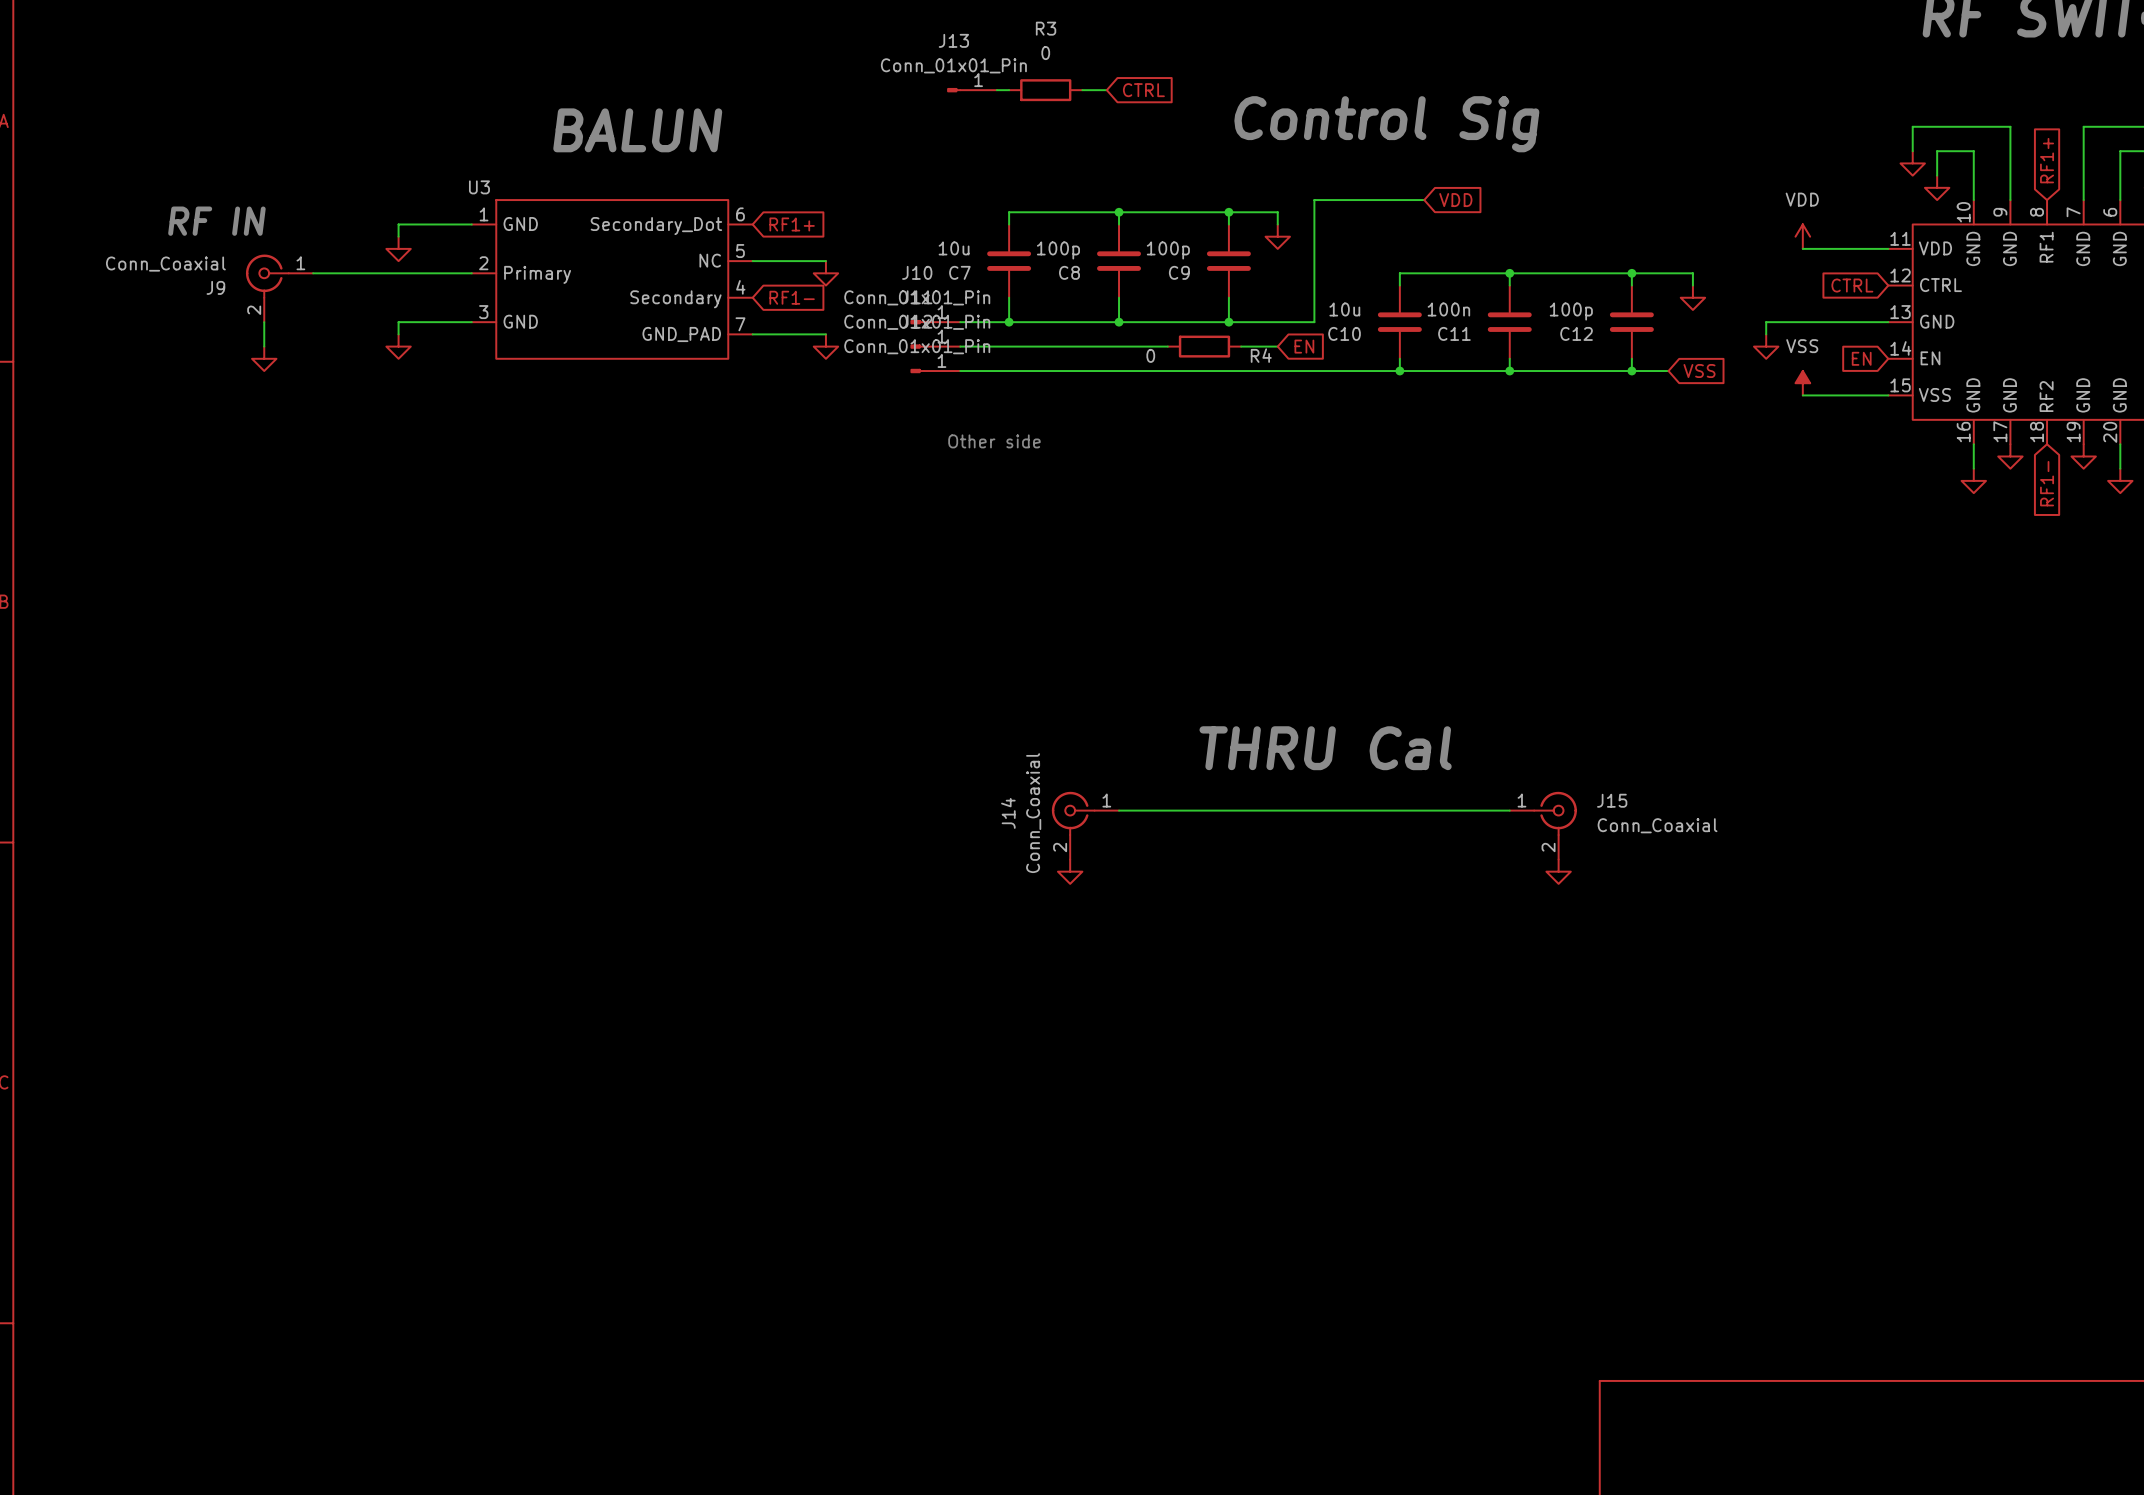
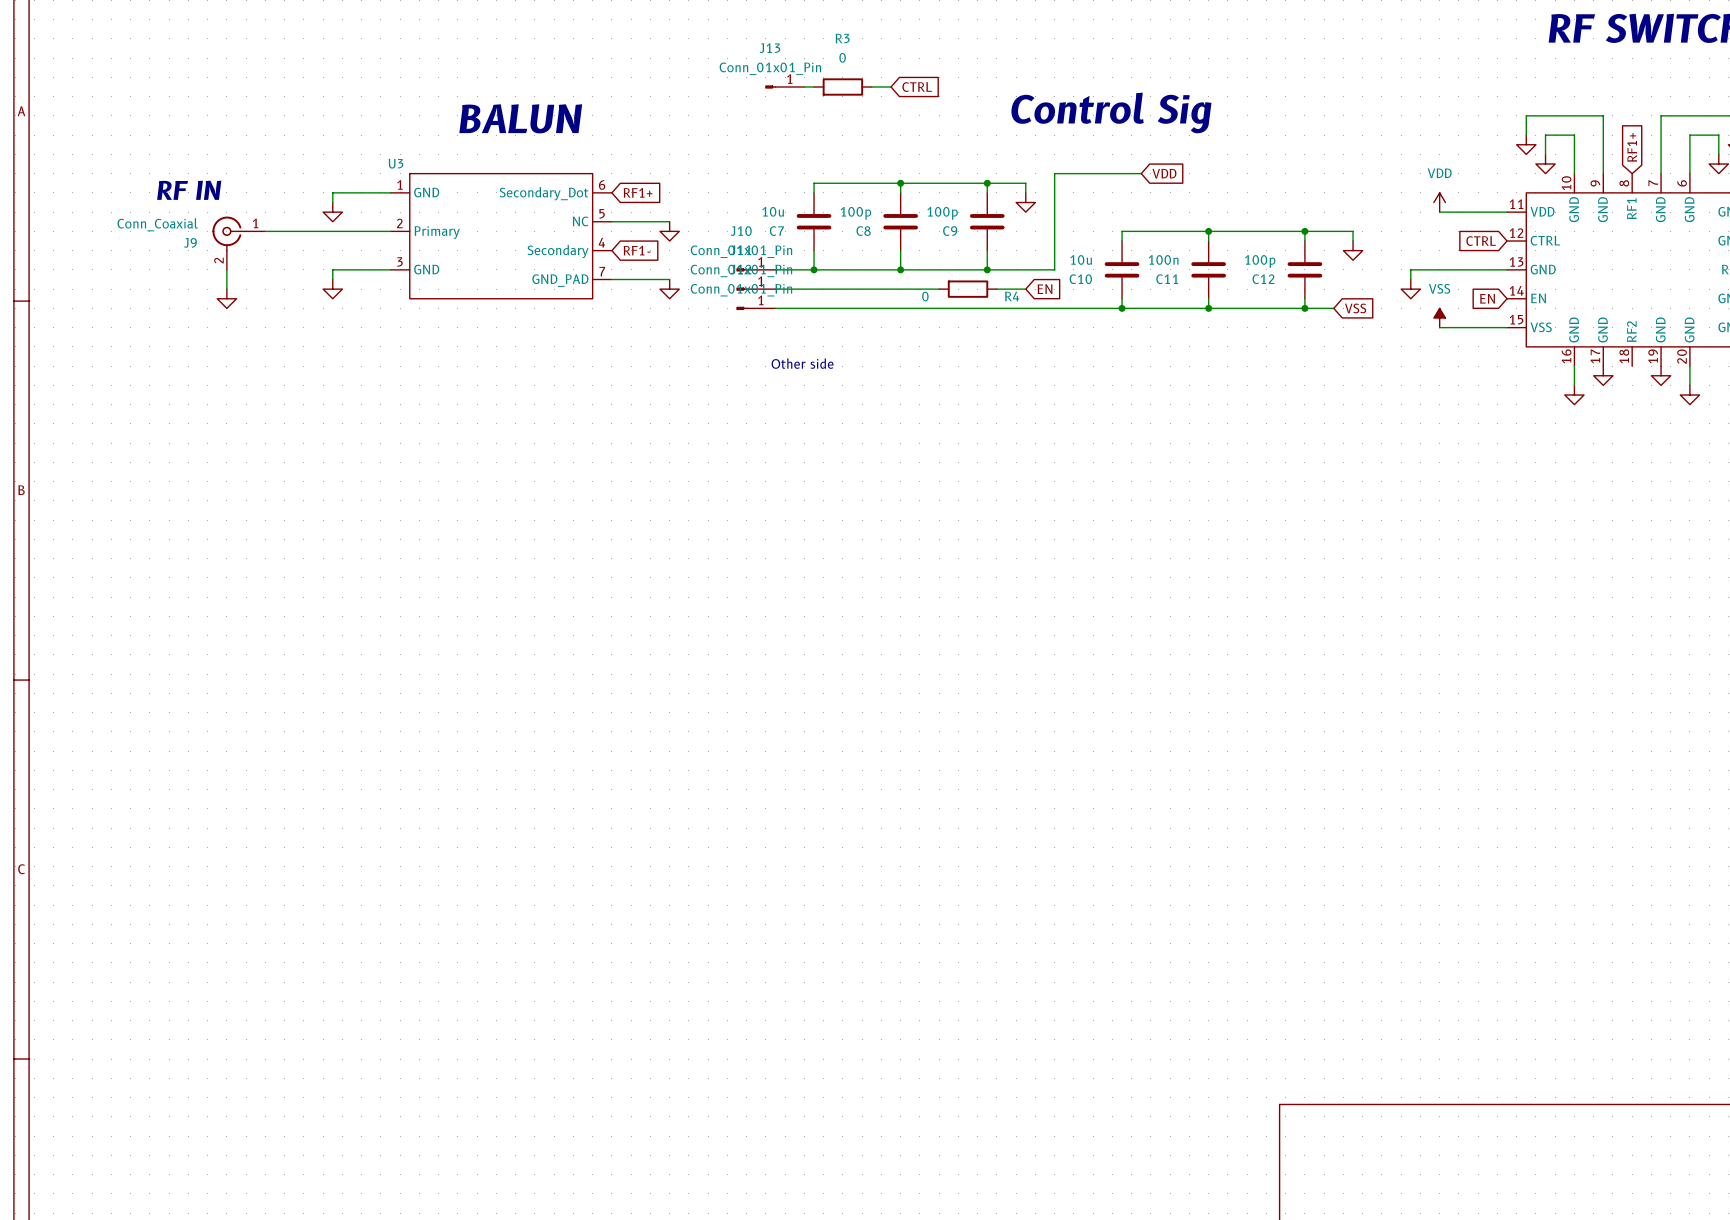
global label: RF1- (2047, 483) -> none
text: THRU Cal (1325, 748) -> none
wire: (1119, 810) (1509, 810) -> none
J14: Conn_Coaxial (1085, 825) -> none
J15: Conn_Coaxial (1543, 825) -> none
power symbol: (1070, 871) -> none
power symbol: (1558, 871) -> none

